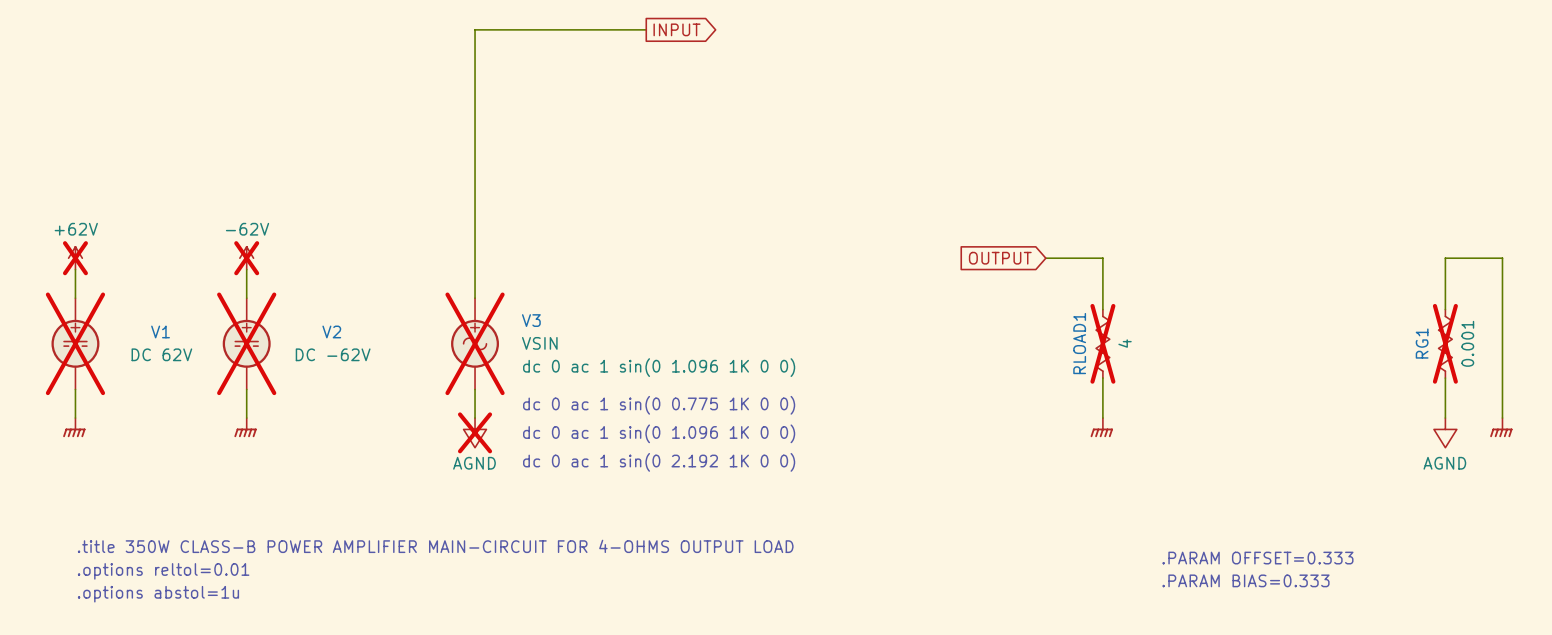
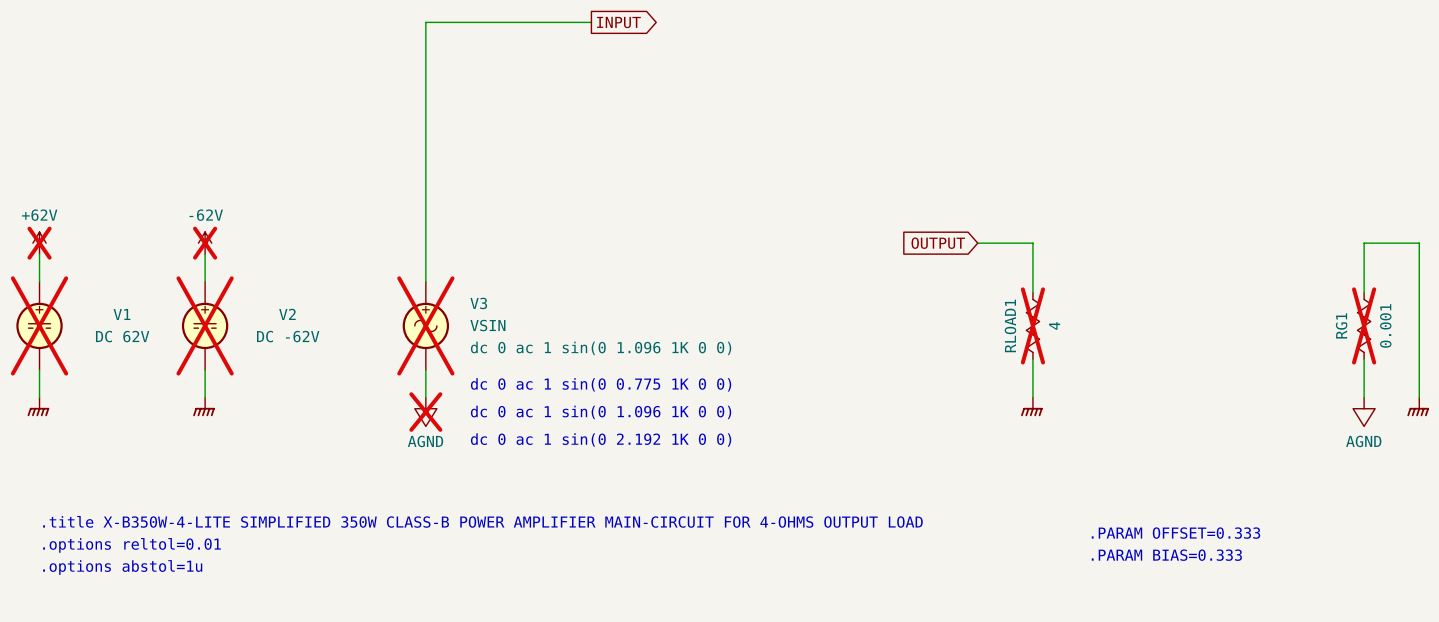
text: .title 350W CLASS-B POWER AMPLIFIER MAIN-CIRCUIT FOR 4-OHMS OUTPUT LOAD (435, 546) -> .title X-B350W-4-LITE SIMPLIFIED 350W CLASS-B POWER AMPLIFIER MAIN-CIRCUIT FOR 4-OHMS OUTPUT LOAD (482, 521)

